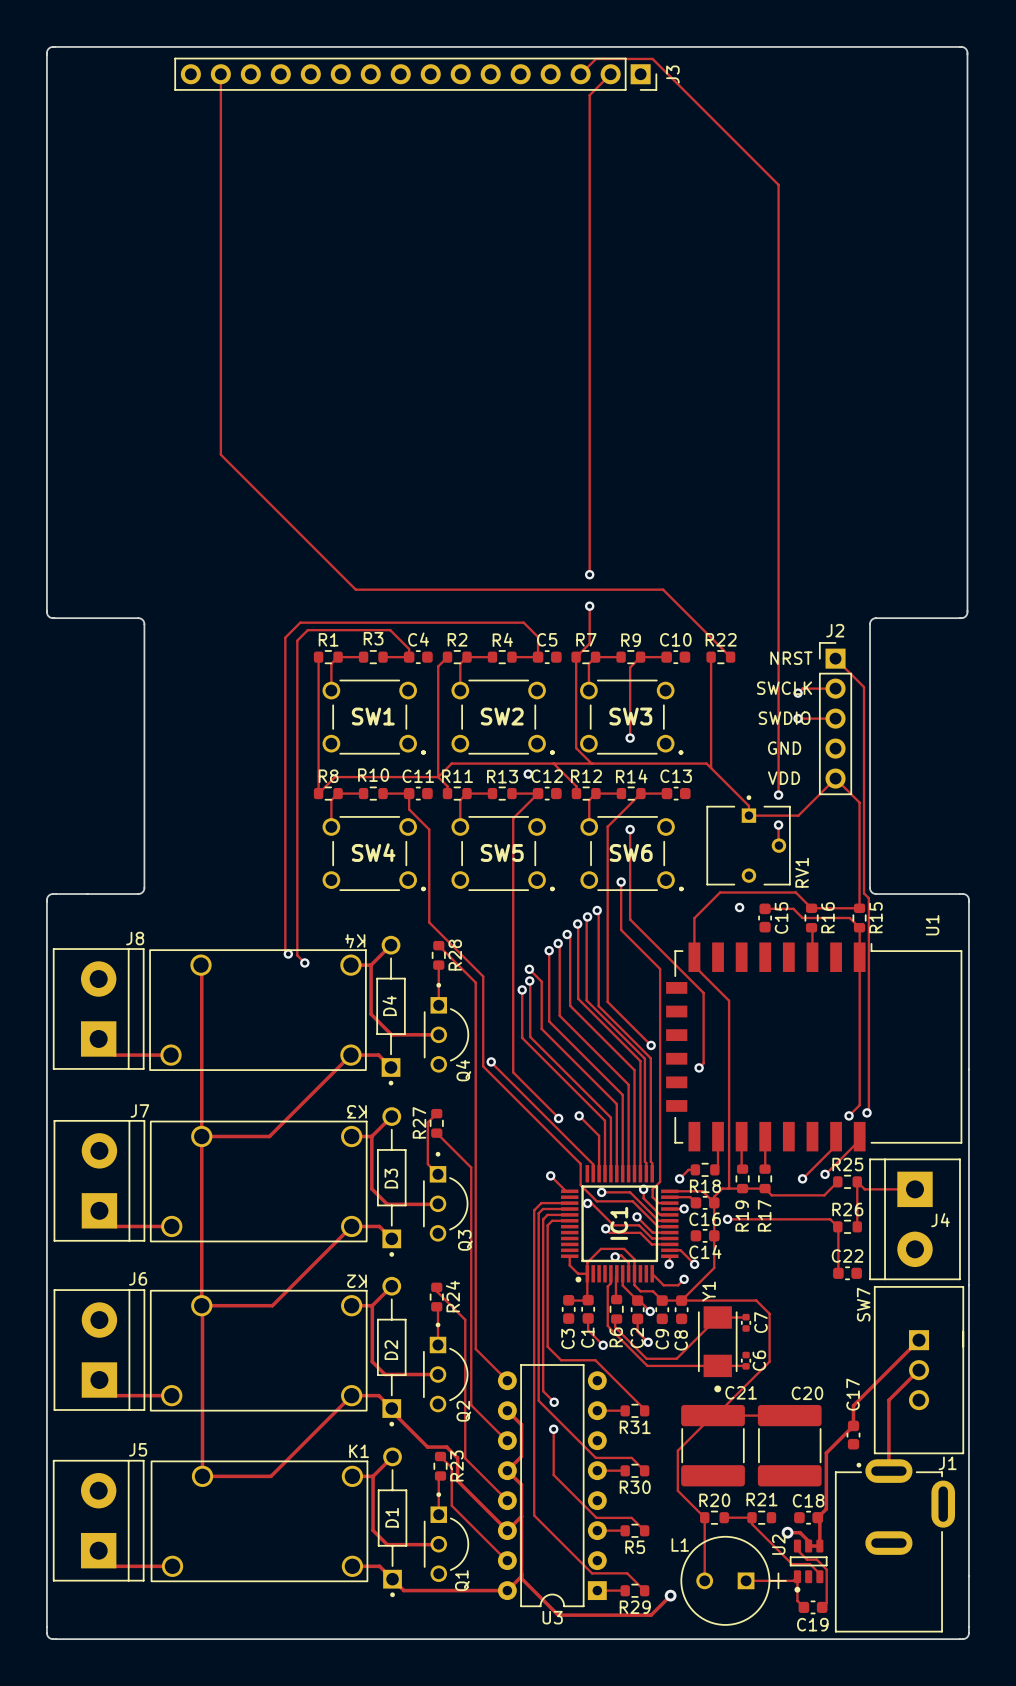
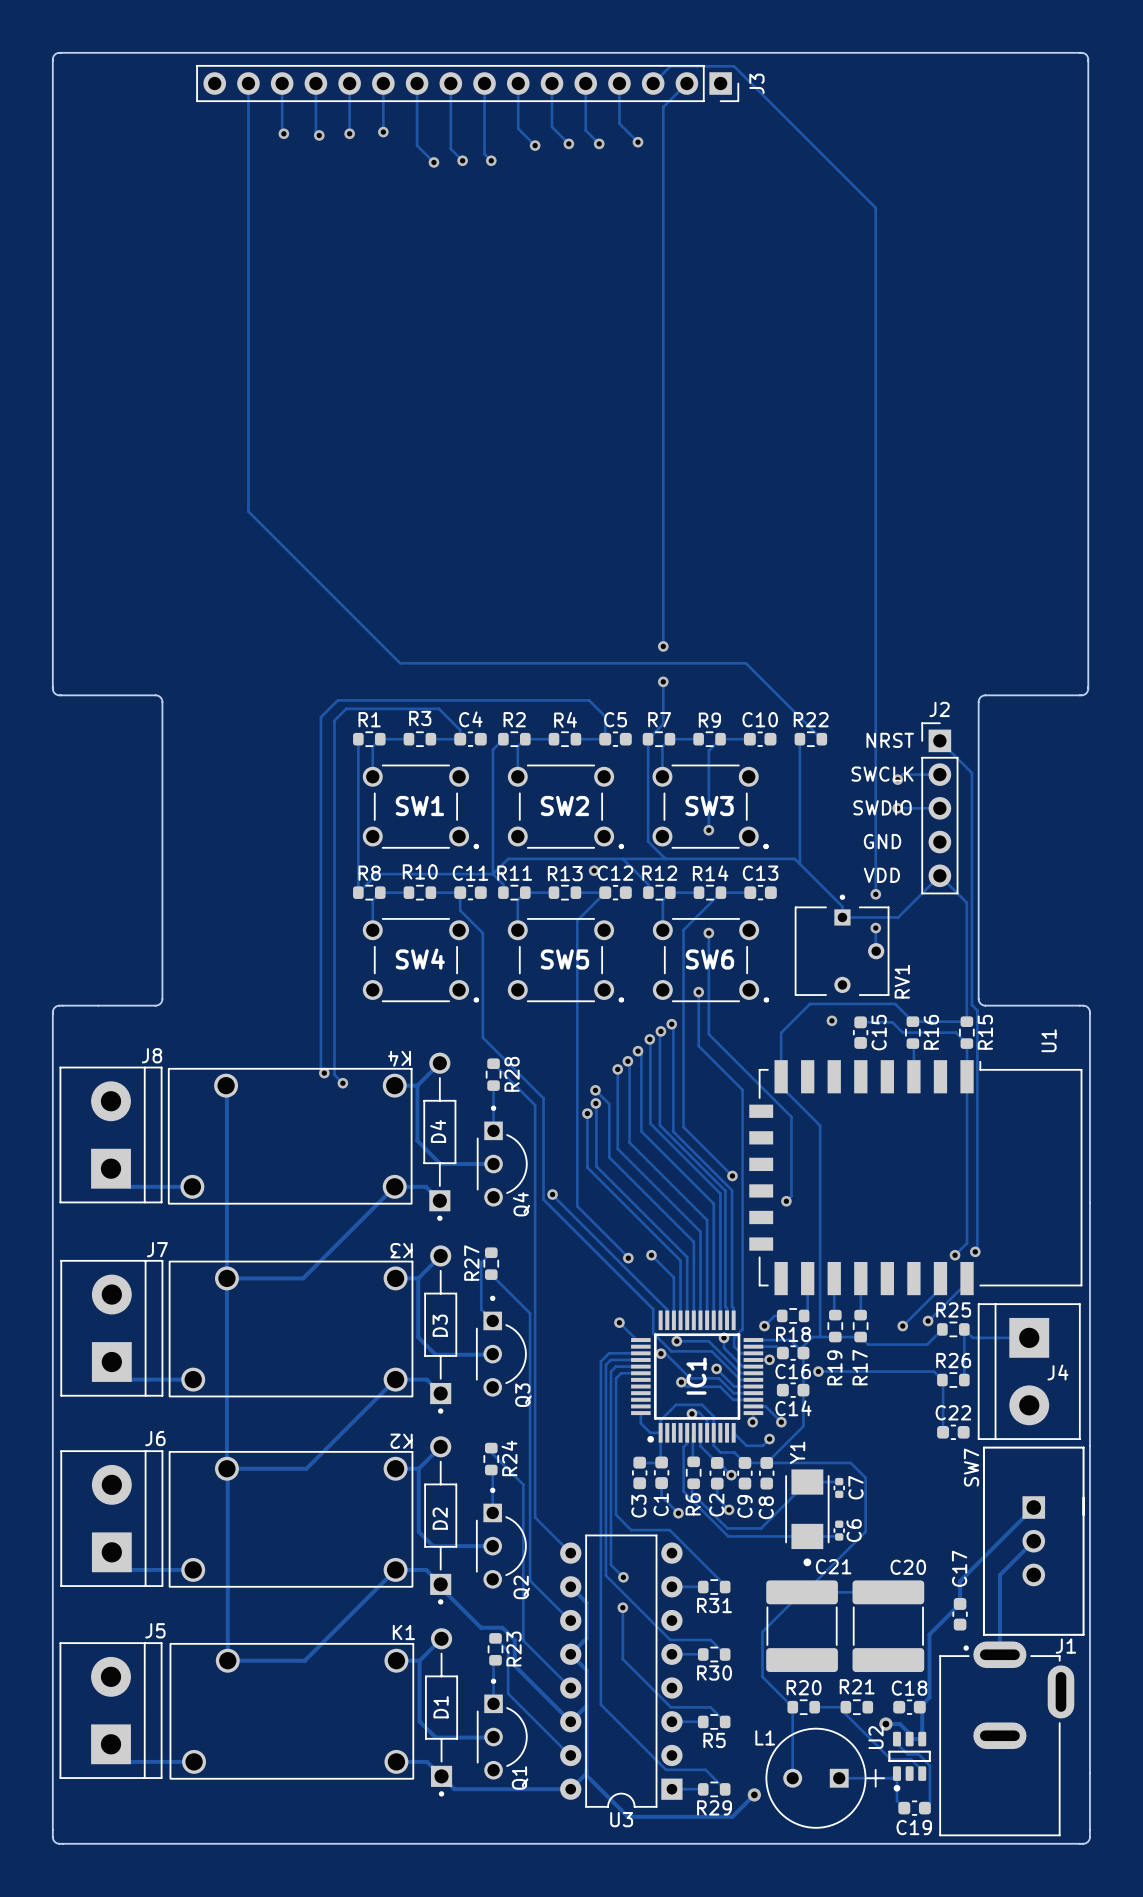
track: none -> (282, 83) (282, 132) (283, 133)
track: none -> (315, 83) (315, 132) (319, 135)
track: none -> (349, 83) (349, 133)
track: none -> (383, 83) (383, 132)
track: none -> (417, 83) (417, 145) (433, 162)
track: none -> (450, 83) (450, 148) (462, 160)
track: none -> (484, 83) (484, 154) (491, 160)
track: none -> (518, 83) (518, 128) (535, 145)
track: none -> (552, 83) (552, 127) (568, 143)
track: none -> (585, 83) (585, 130) (599, 143)
track: none -> (619, 83) (619, 123) (638, 142)
via: none -> (383, 132)
via: none -> (283, 133)
via: none -> (349, 133)
via: none -> (319, 135)
via: none -> (638, 142)
via: none -> (568, 143)
via: none -> (599, 143)
via: none -> (535, 145)
via: none -> (462, 160)
via: none -> (491, 160)
via: none -> (433, 162)

